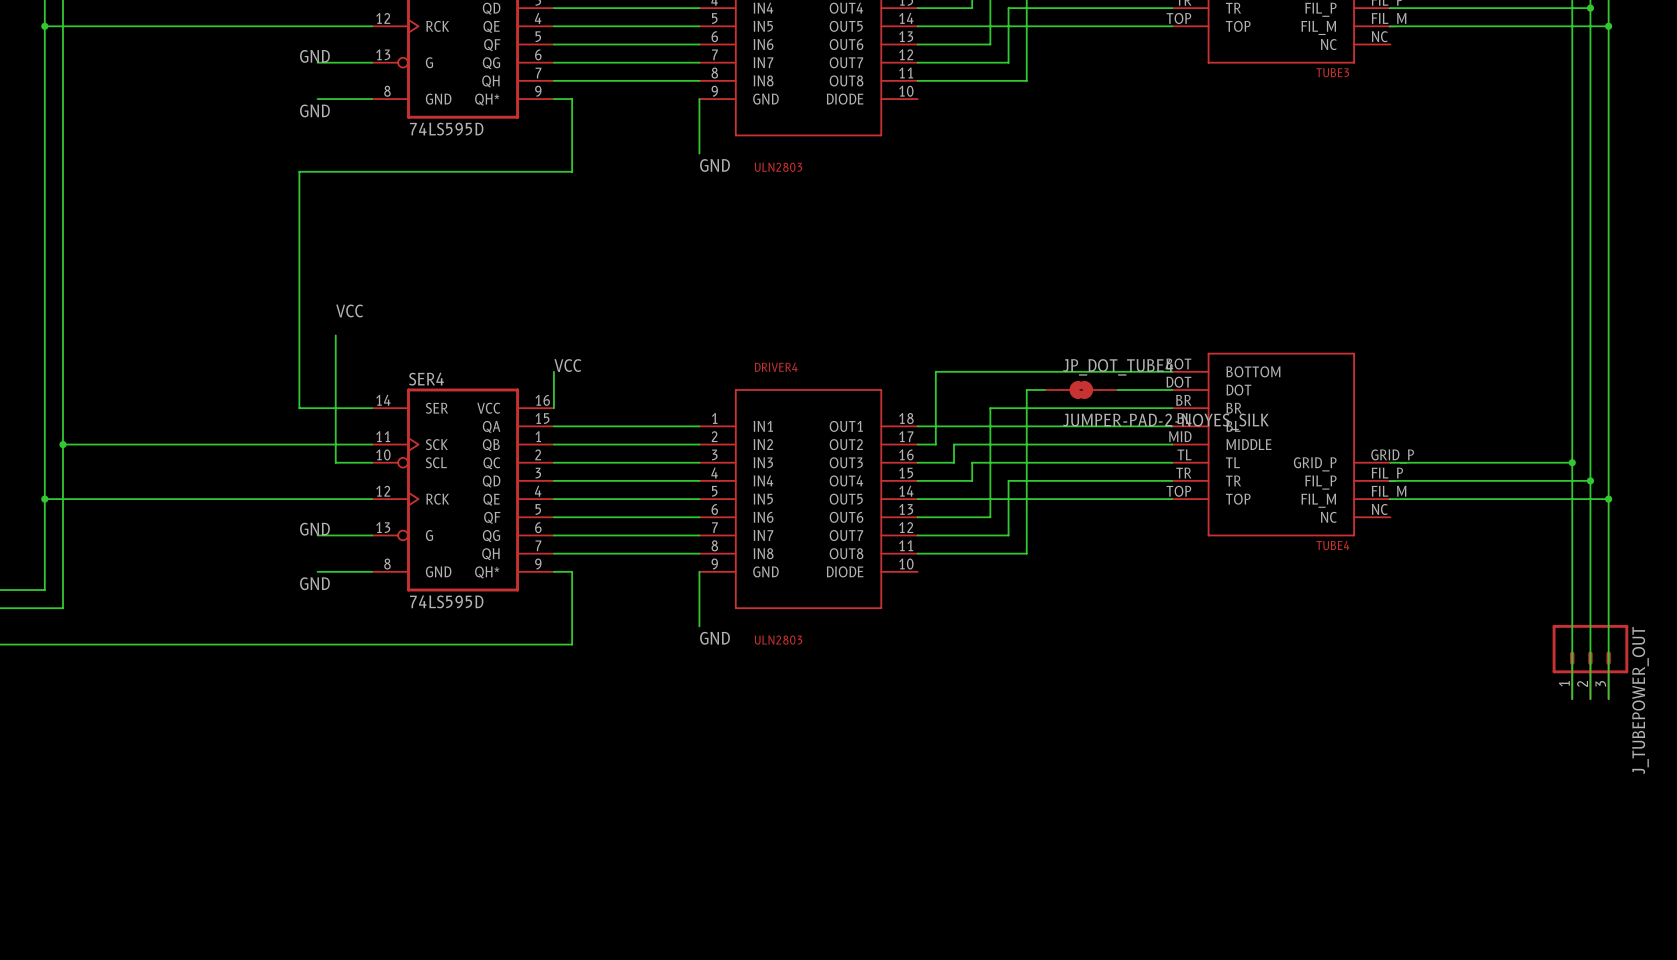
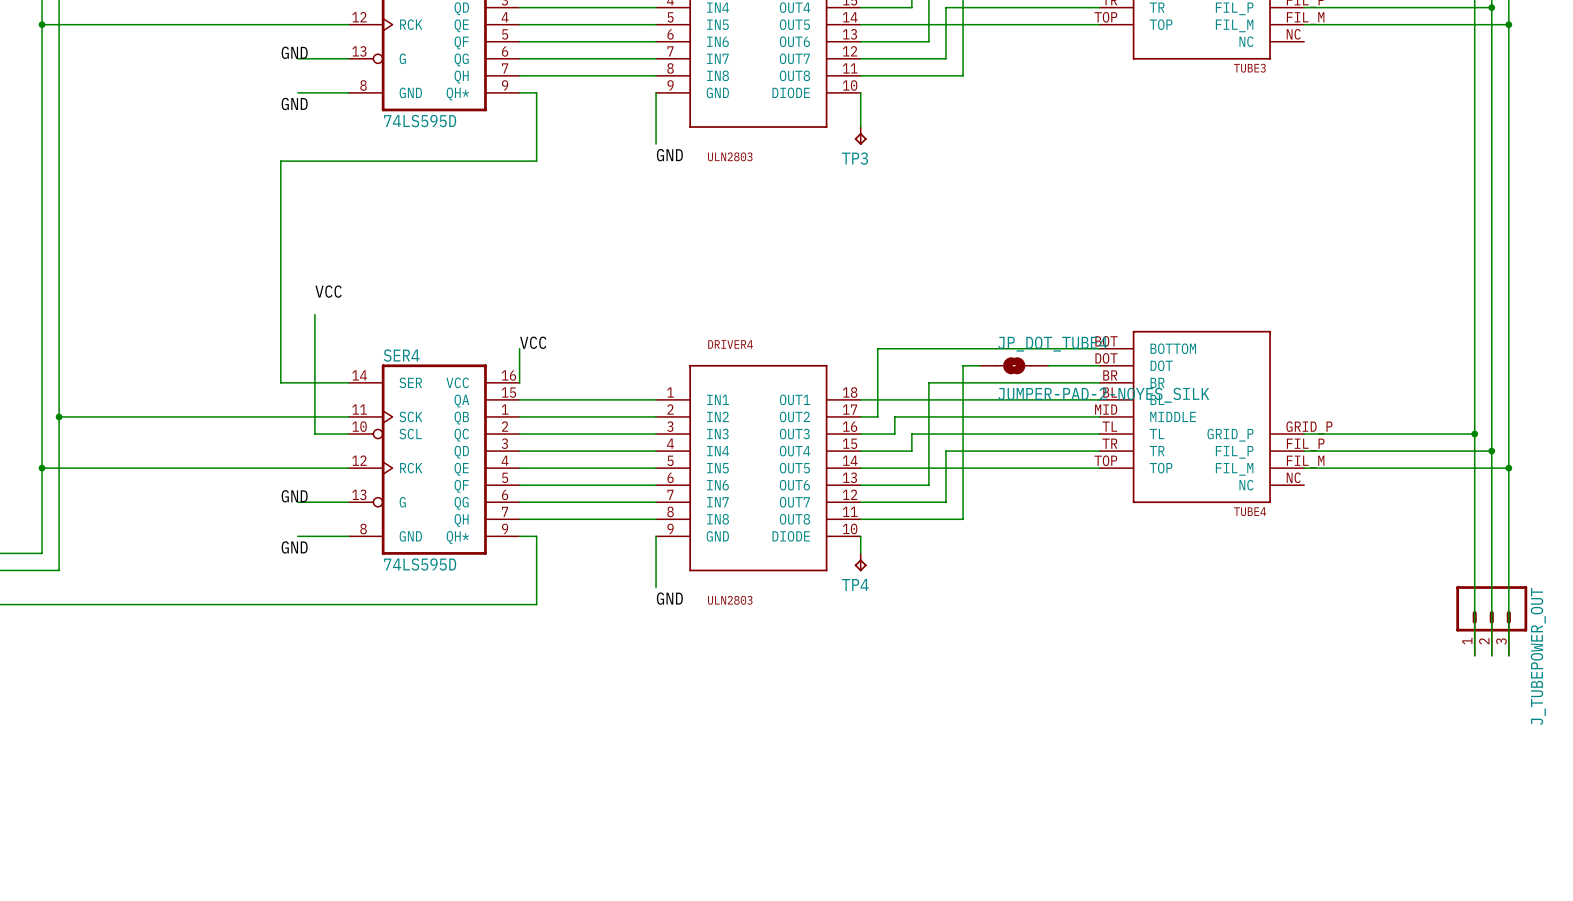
wire: none -> (860, 92) (860, 127)
TP3: none -> (860, 135)
wire: none -> (860, 536) (860, 553)
TP4: none -> (860, 562)

